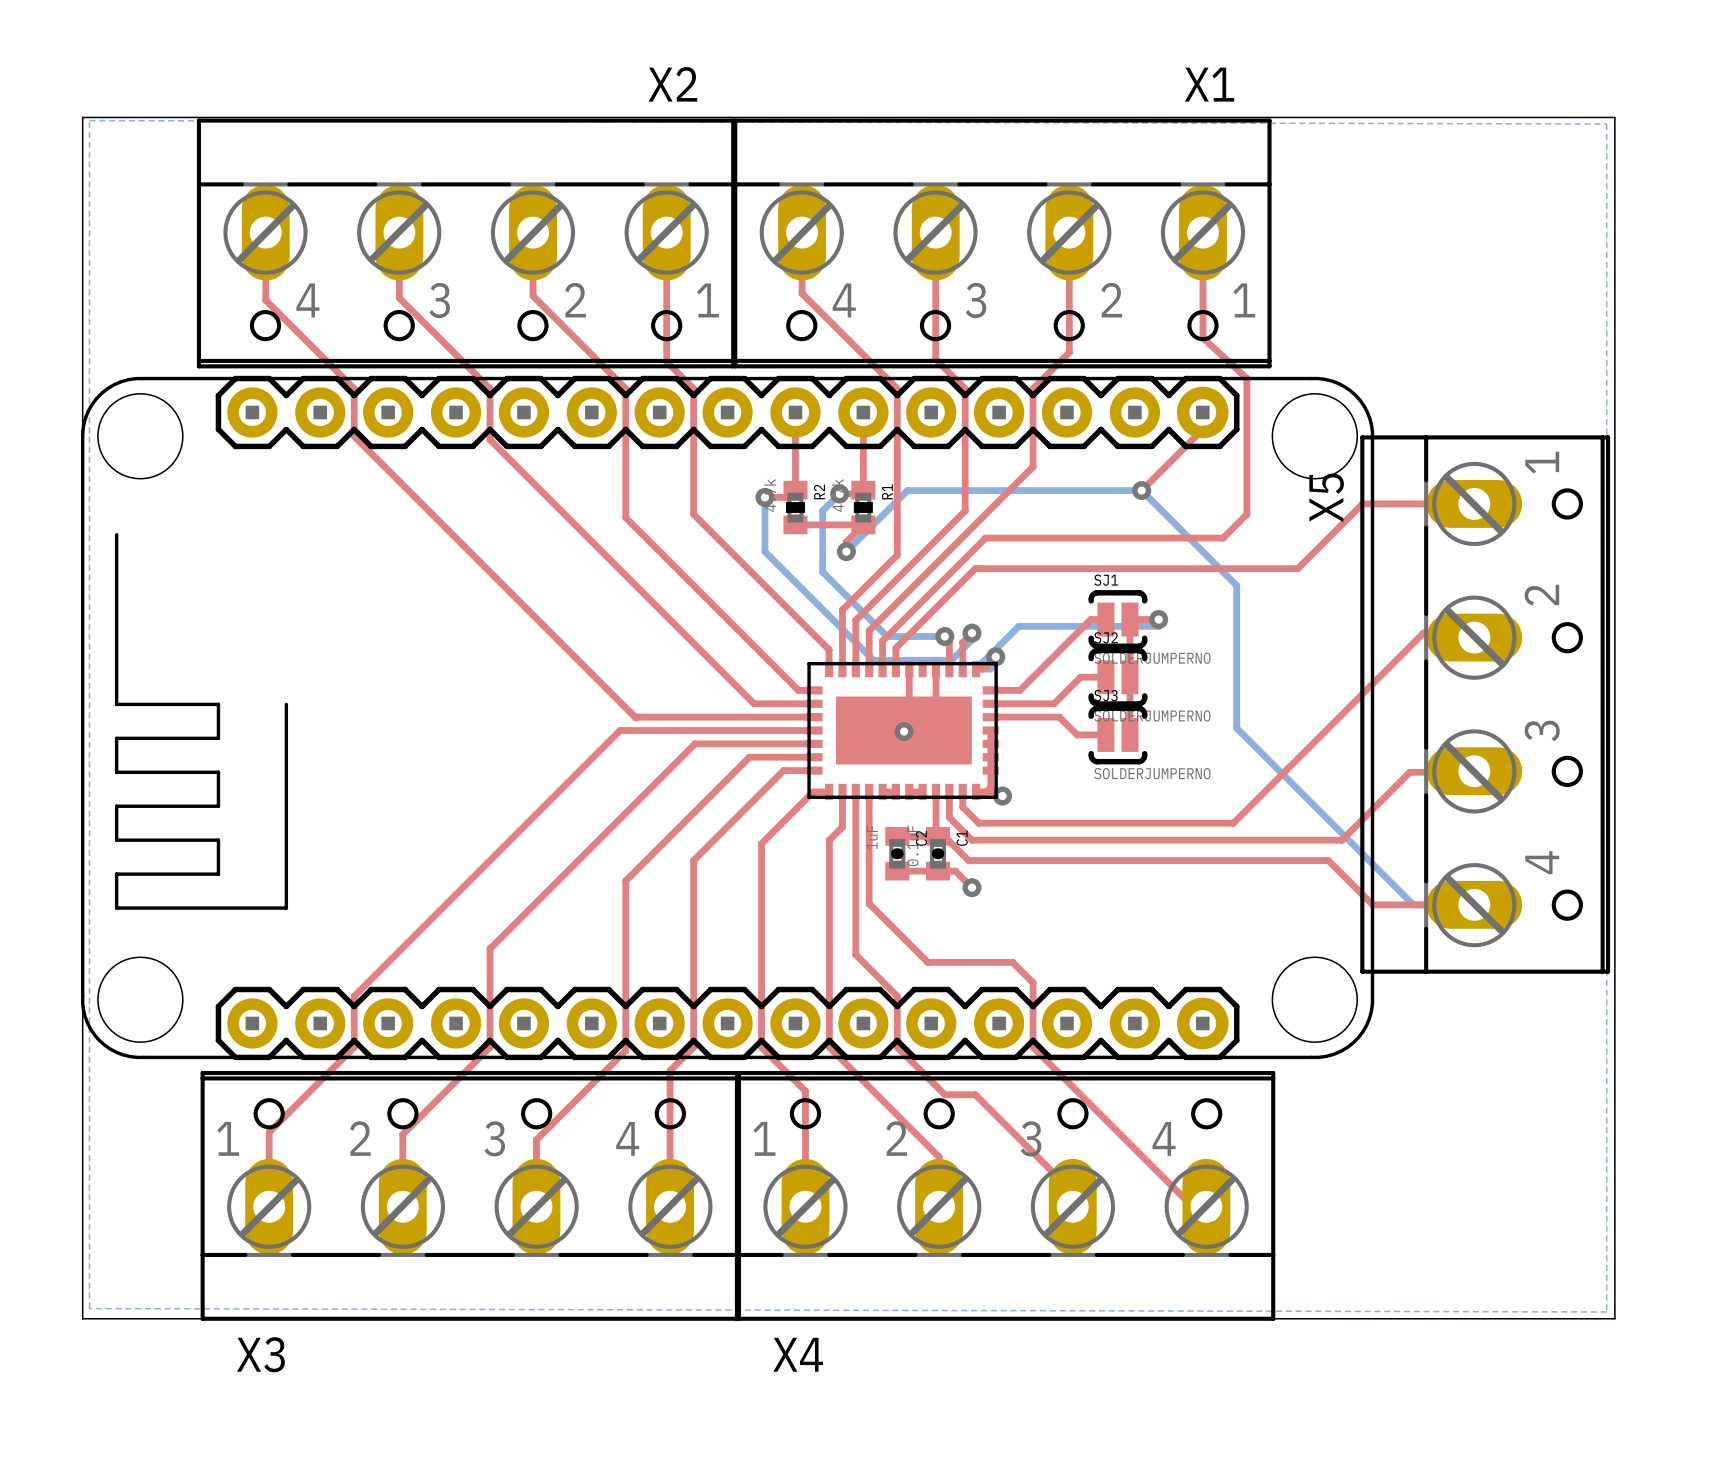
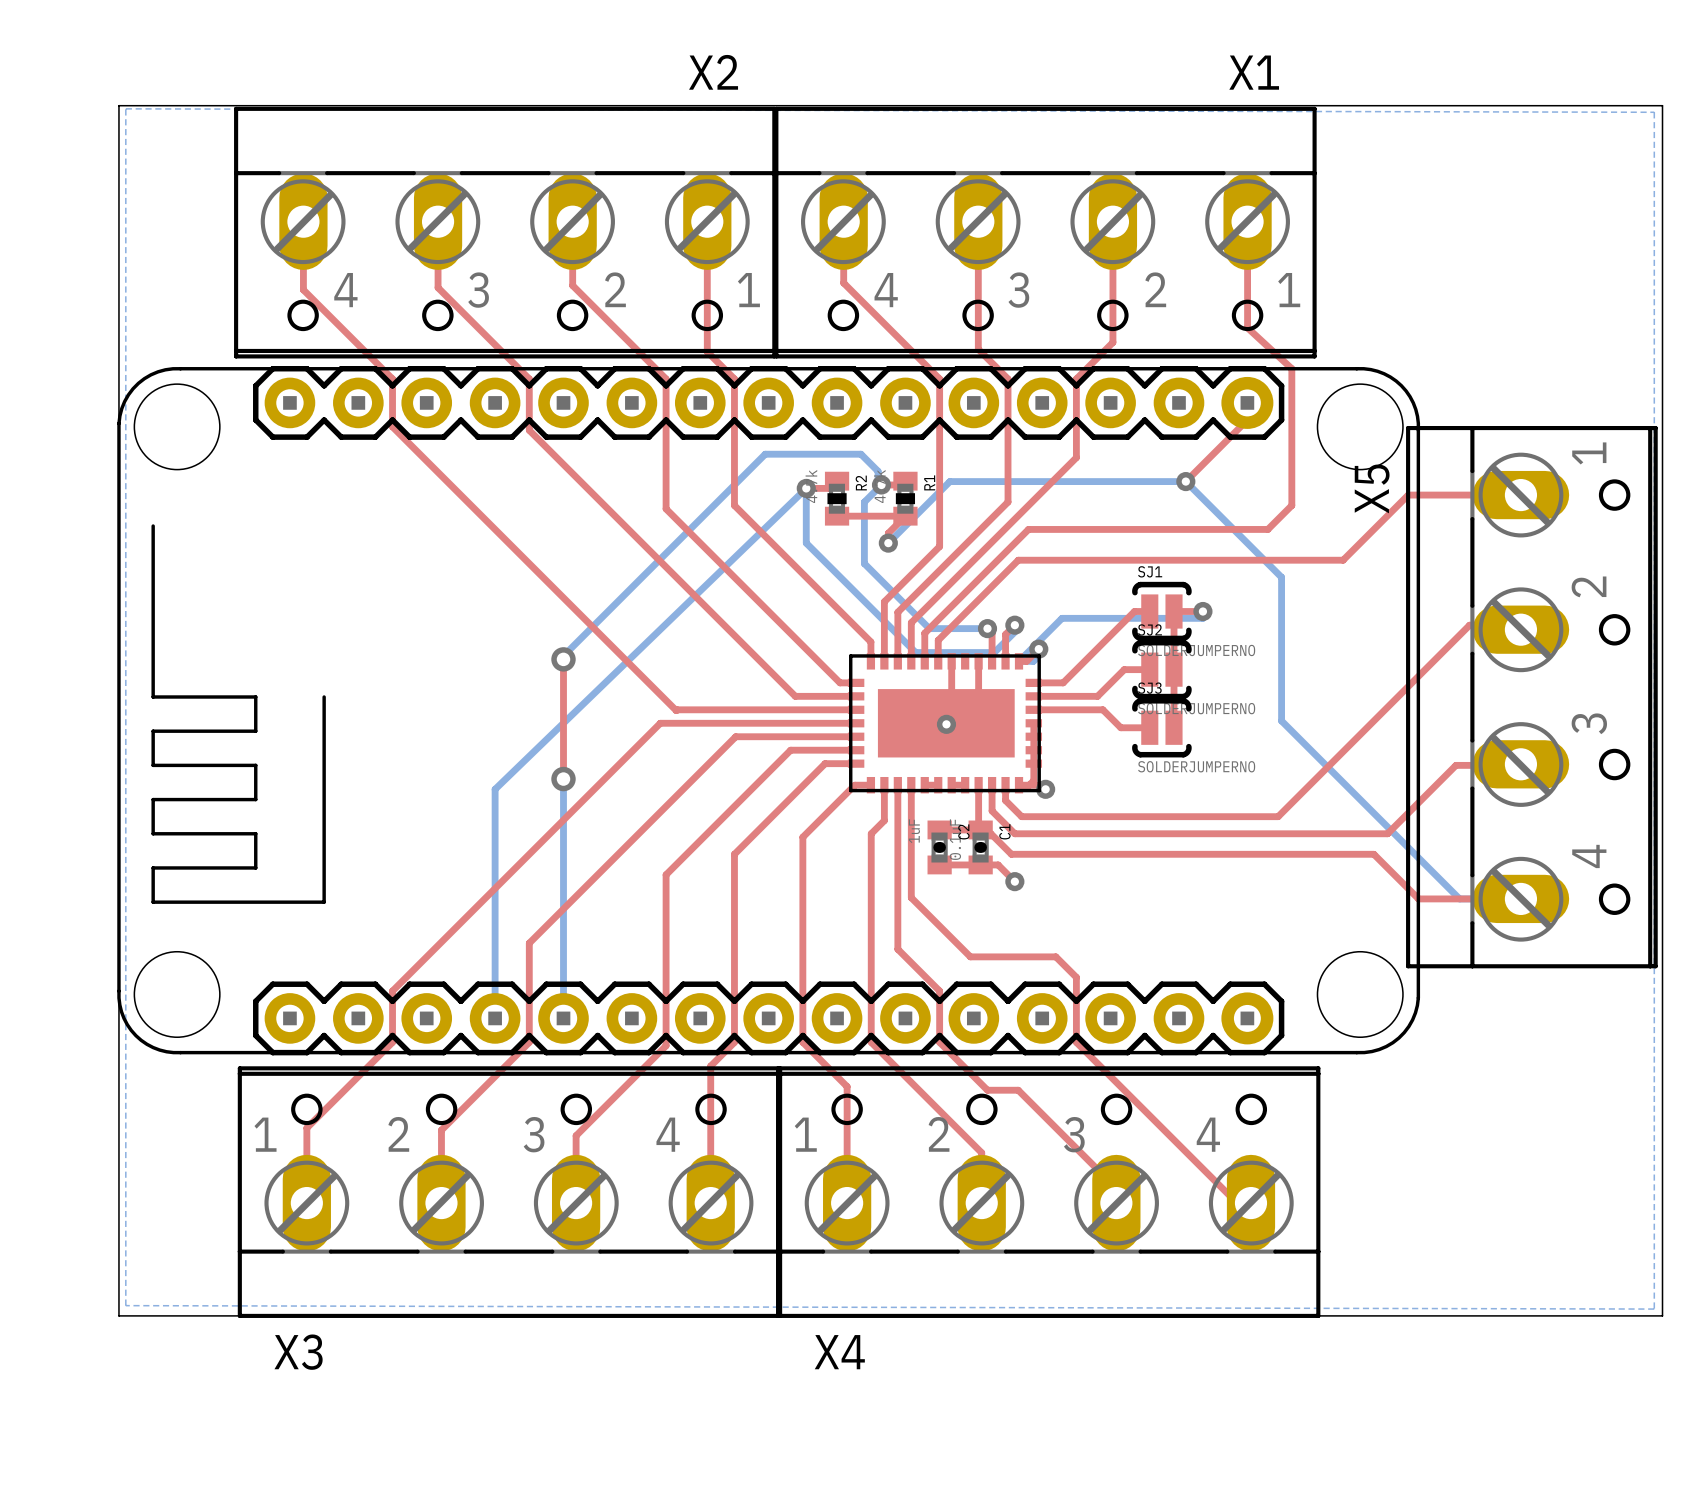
top track: (795, 412) (795, 490) -> none
top track: (863, 412) (863, 490) -> none
bottom track: none -> (881, 484) (878, 481) (878, 471) (860, 454) (765, 454) (563, 655) (563, 659)
bottom track: none -> (806, 488) (495, 789) (495, 1018)
top track: none -> (563, 659) (563, 779)
via: none -> (563, 659)
bottom track: none -> (563, 779) (563, 1018)
via: none -> (563, 779)

